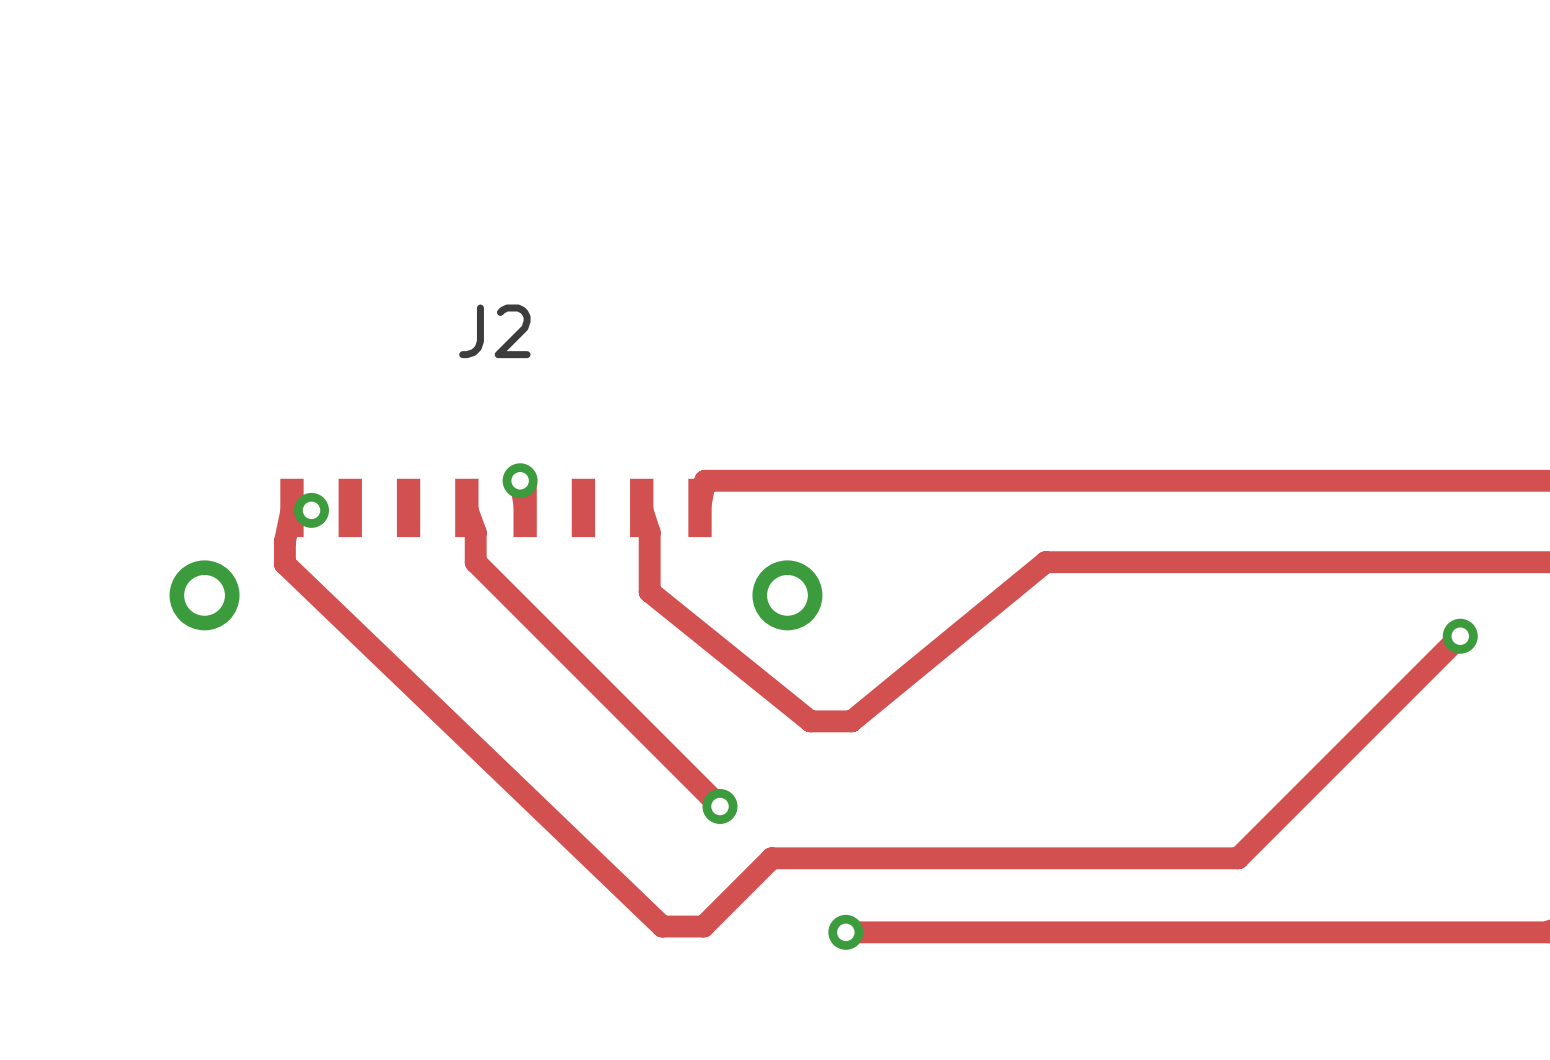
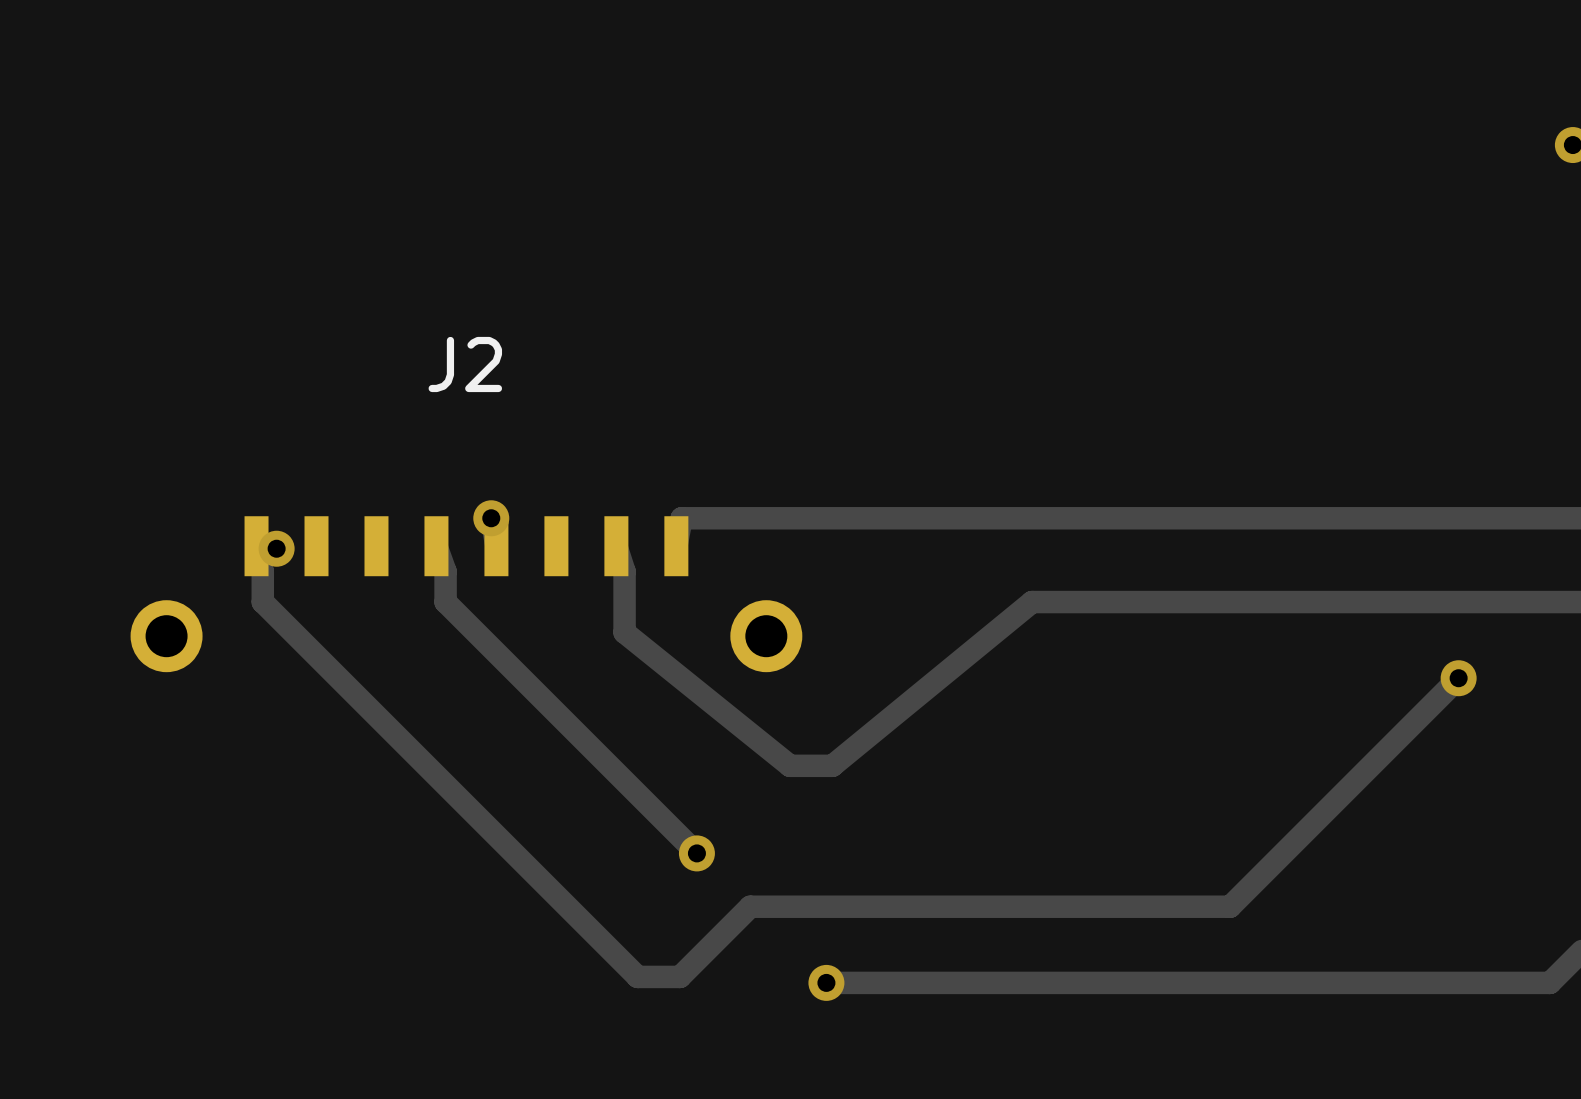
track: (291, 507) (284, 541) (284, 563) (662, 926) -> (256, 546) (262, 571) (262, 602) (637, 976)

